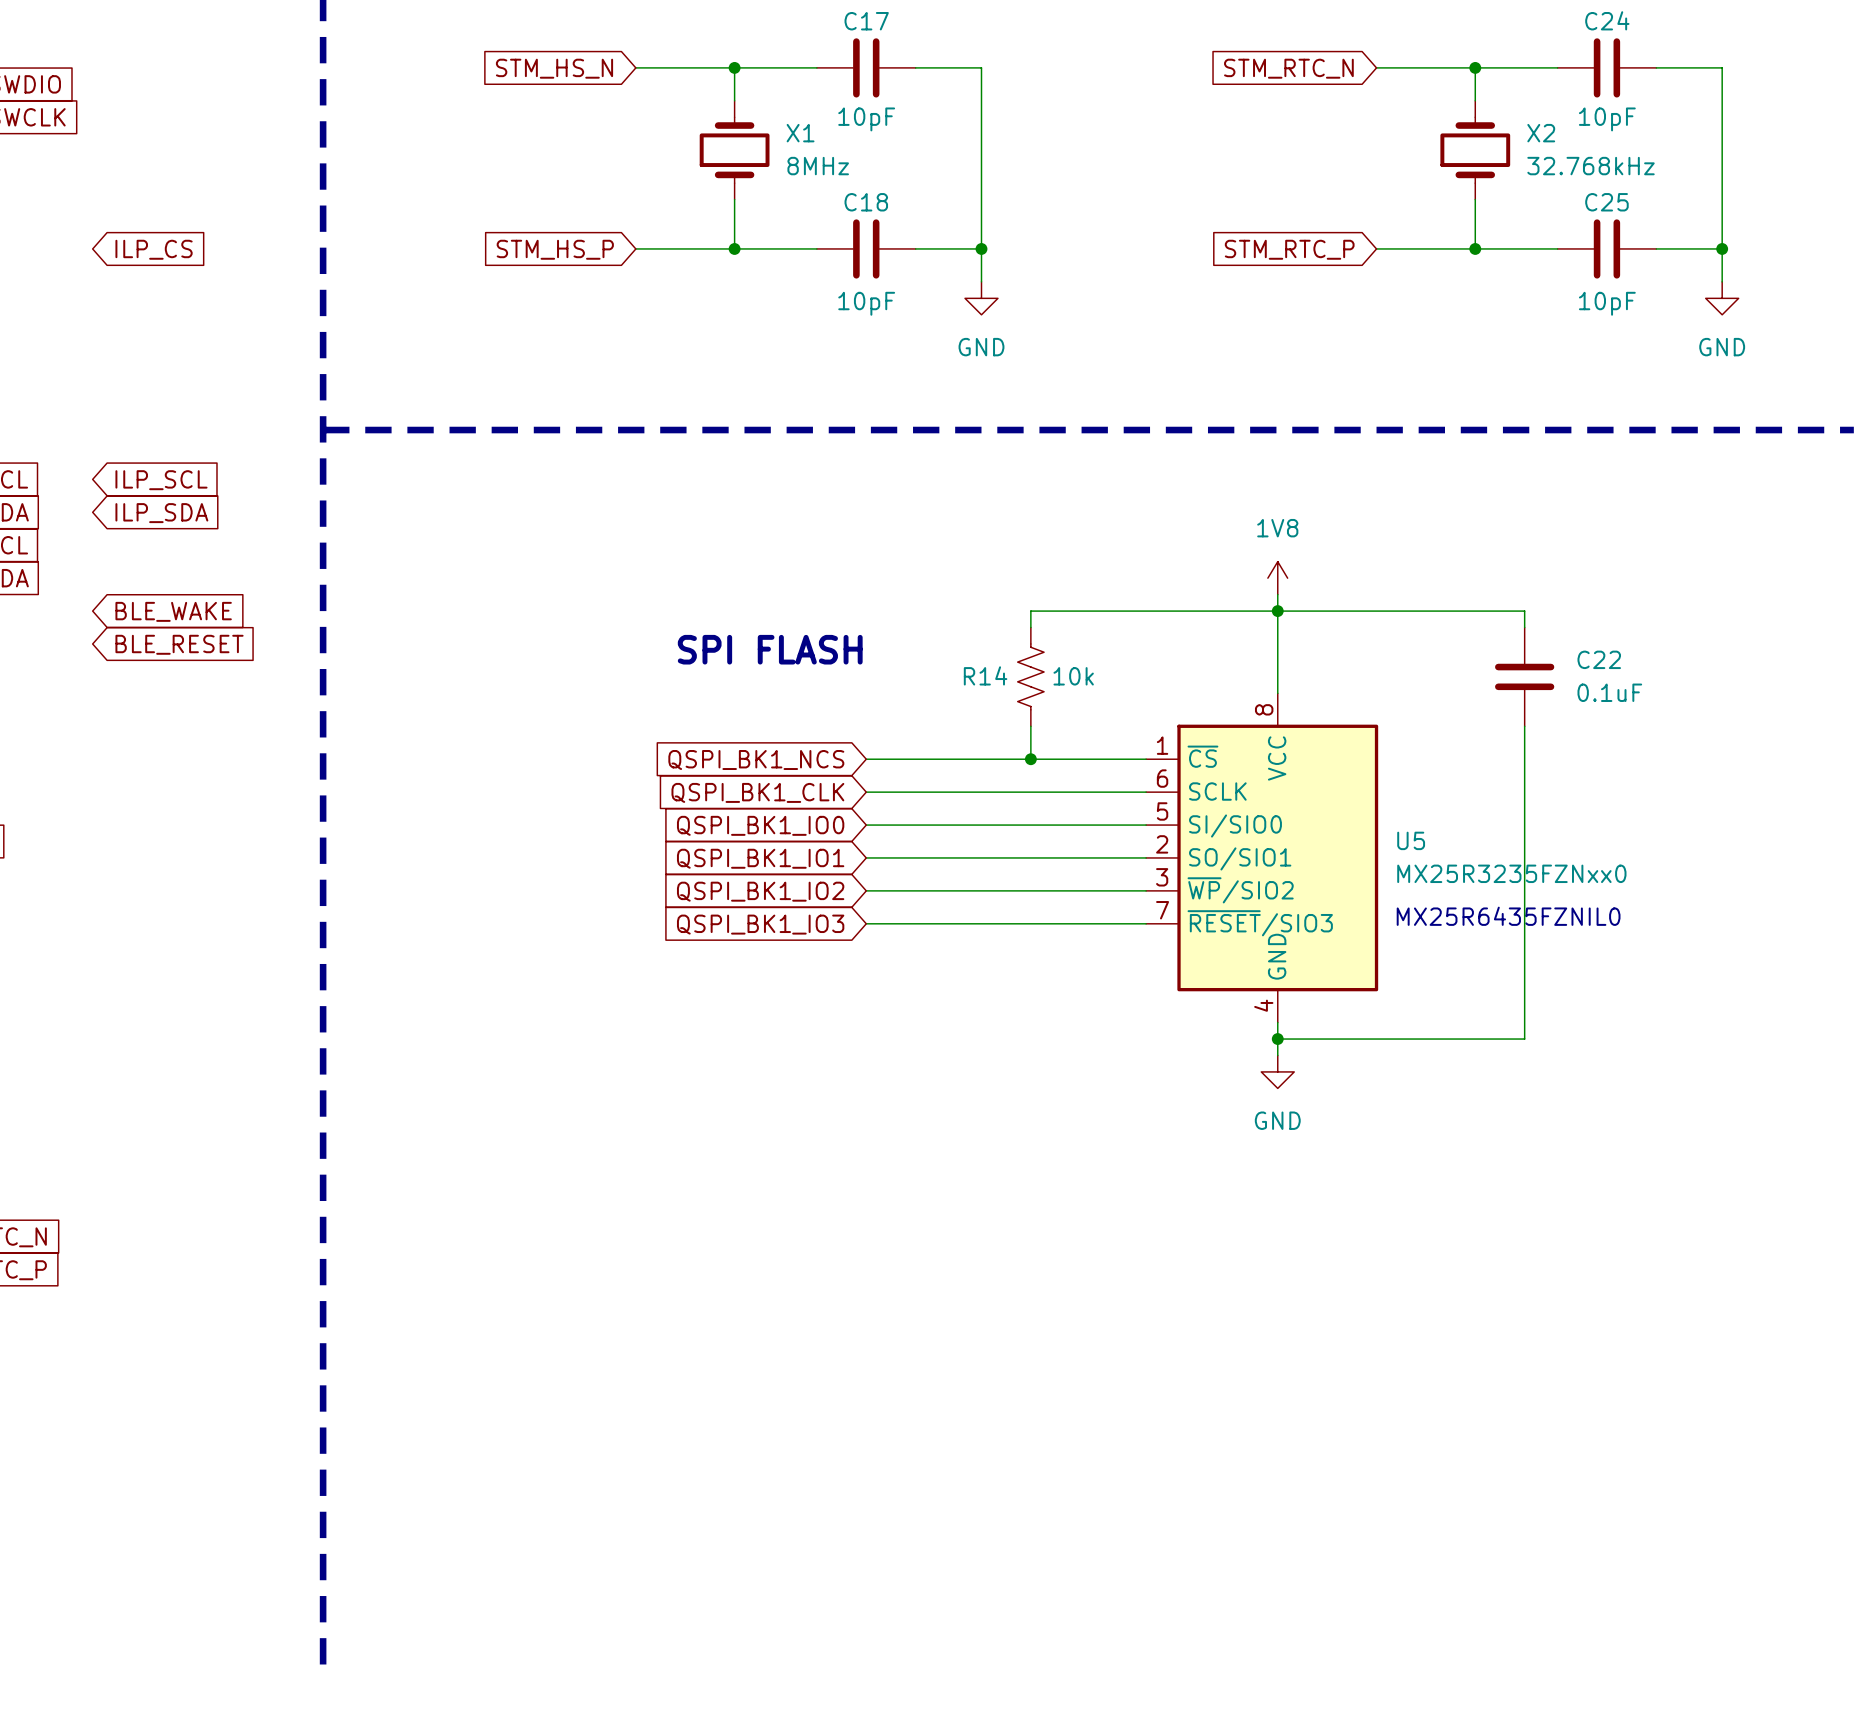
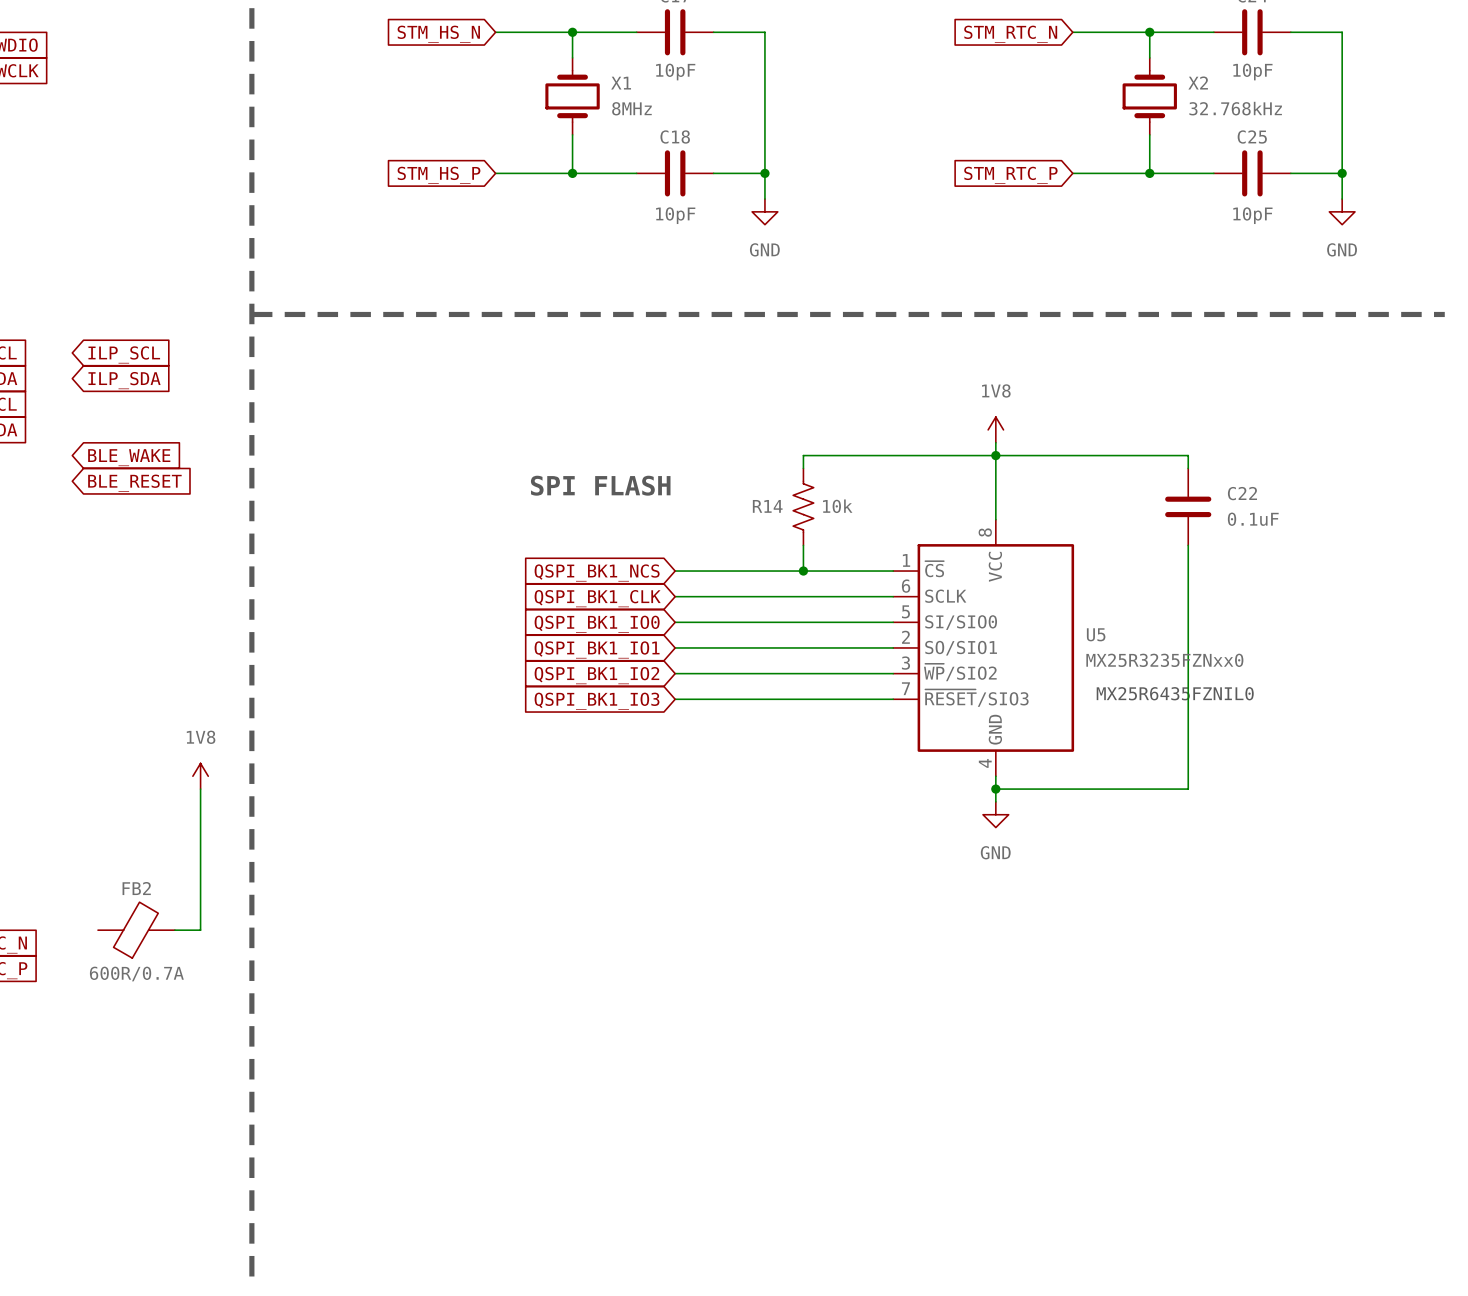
global label: ILP_CS (154, 249) -> none
power symbol: none -> 1V8 (200, 776)
wire: none -> (200, 789) (200, 930) (174, 930)
FB2: none -> 600R/0.7A (136, 930)

